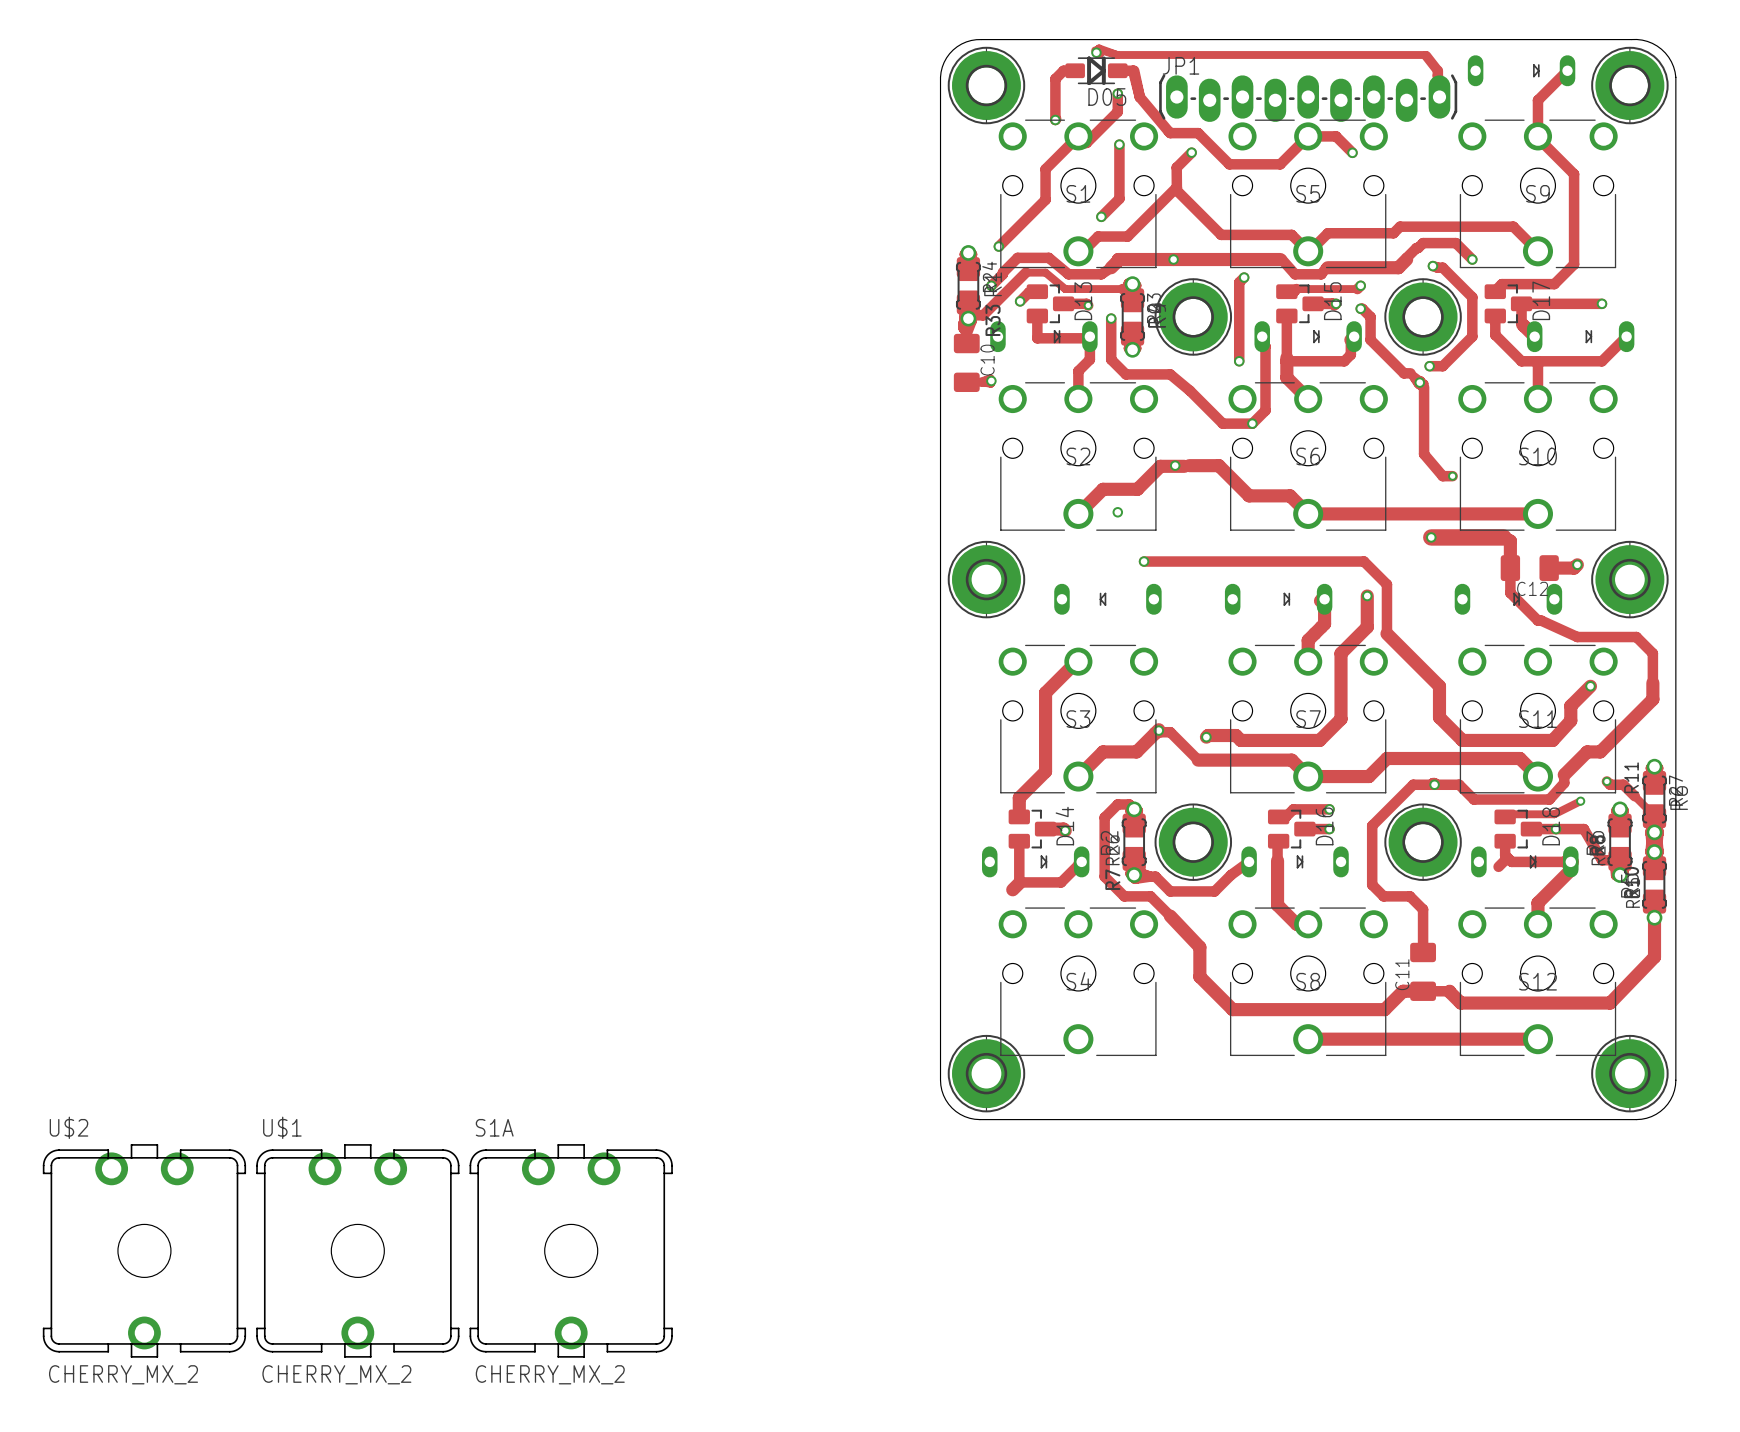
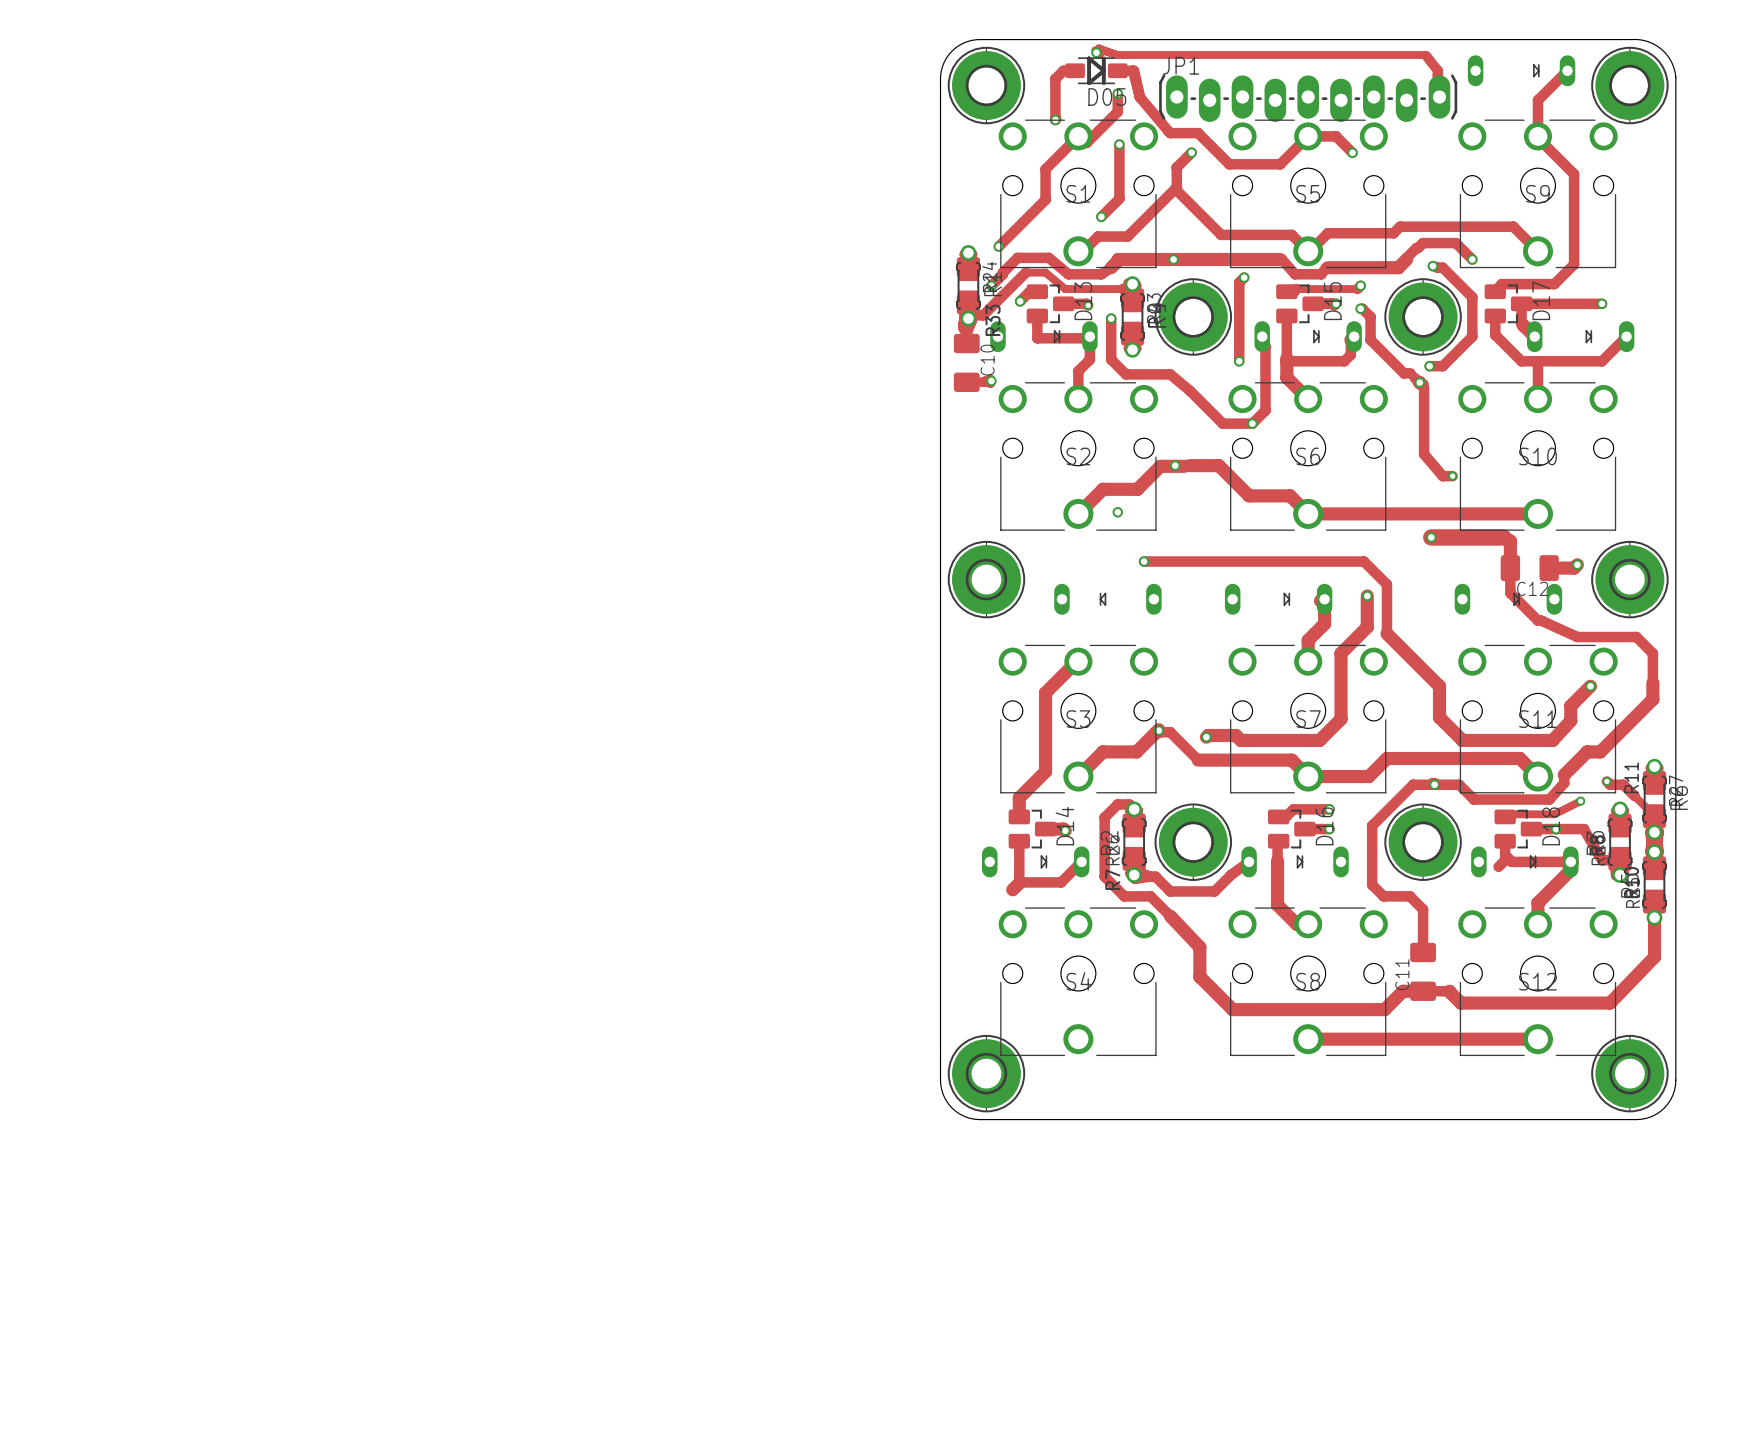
U$2: CHERRY_MX_2 (144, 1250) -> none
U$1: CHERRY_MX_2 (357, 1250) -> none
S1A: CHERRY_MX_2 (571, 1250) -> none

